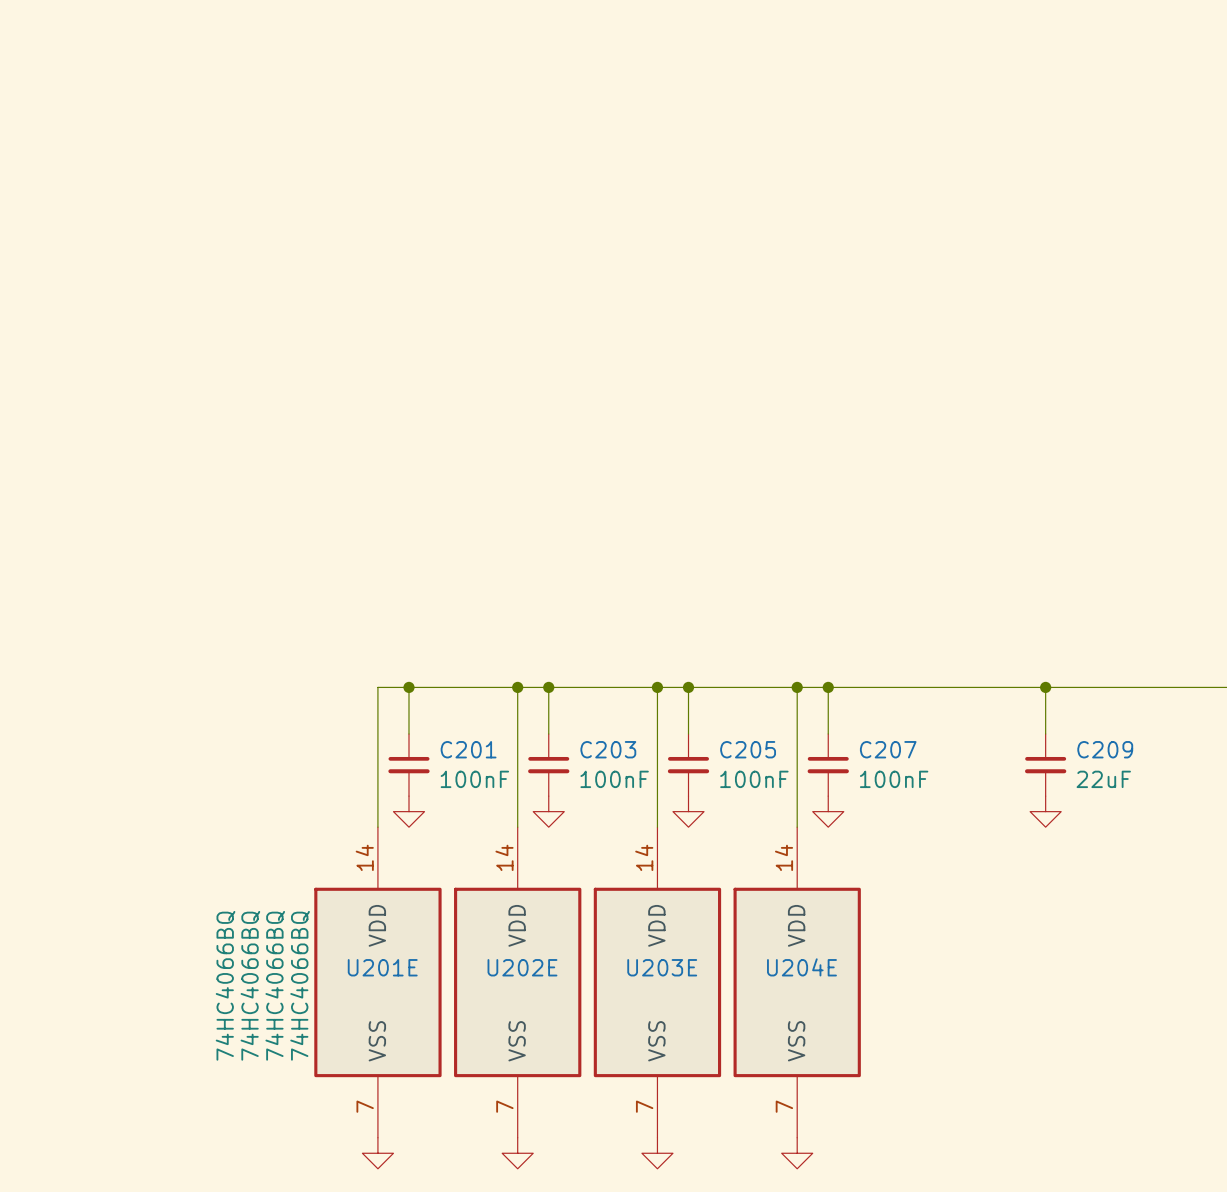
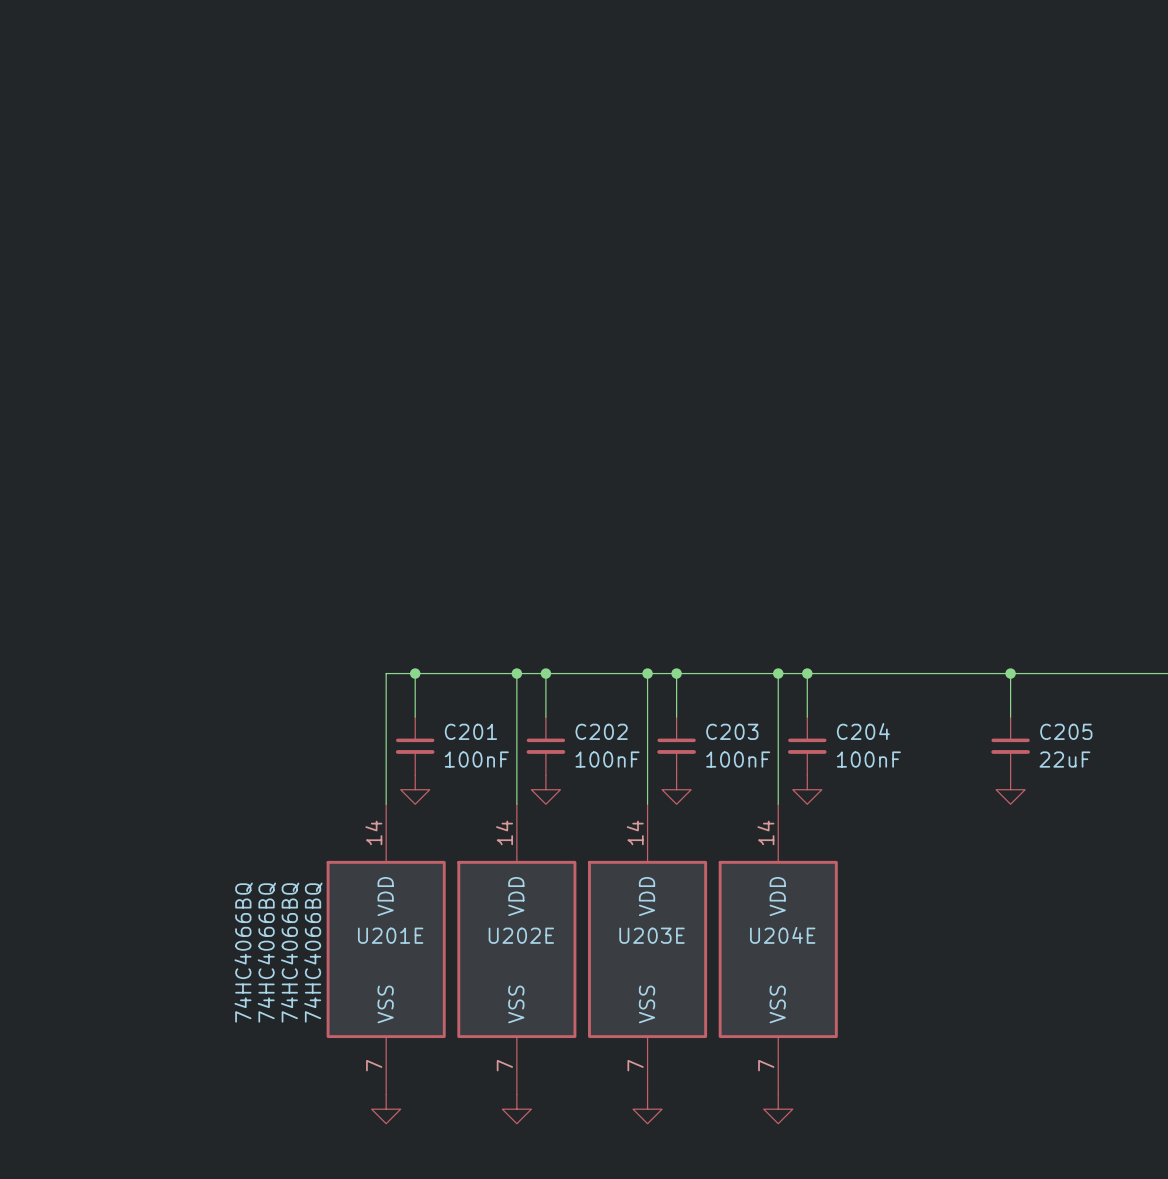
C203 name: C203 (608, 749) -> C202 (601, 731)
C205 name: C205 (748, 749) -> C203 (732, 731)
C207 name: C207 (888, 749) -> C204 (863, 731)
C209 name: C209 (1105, 749) -> C205 (1066, 731)

